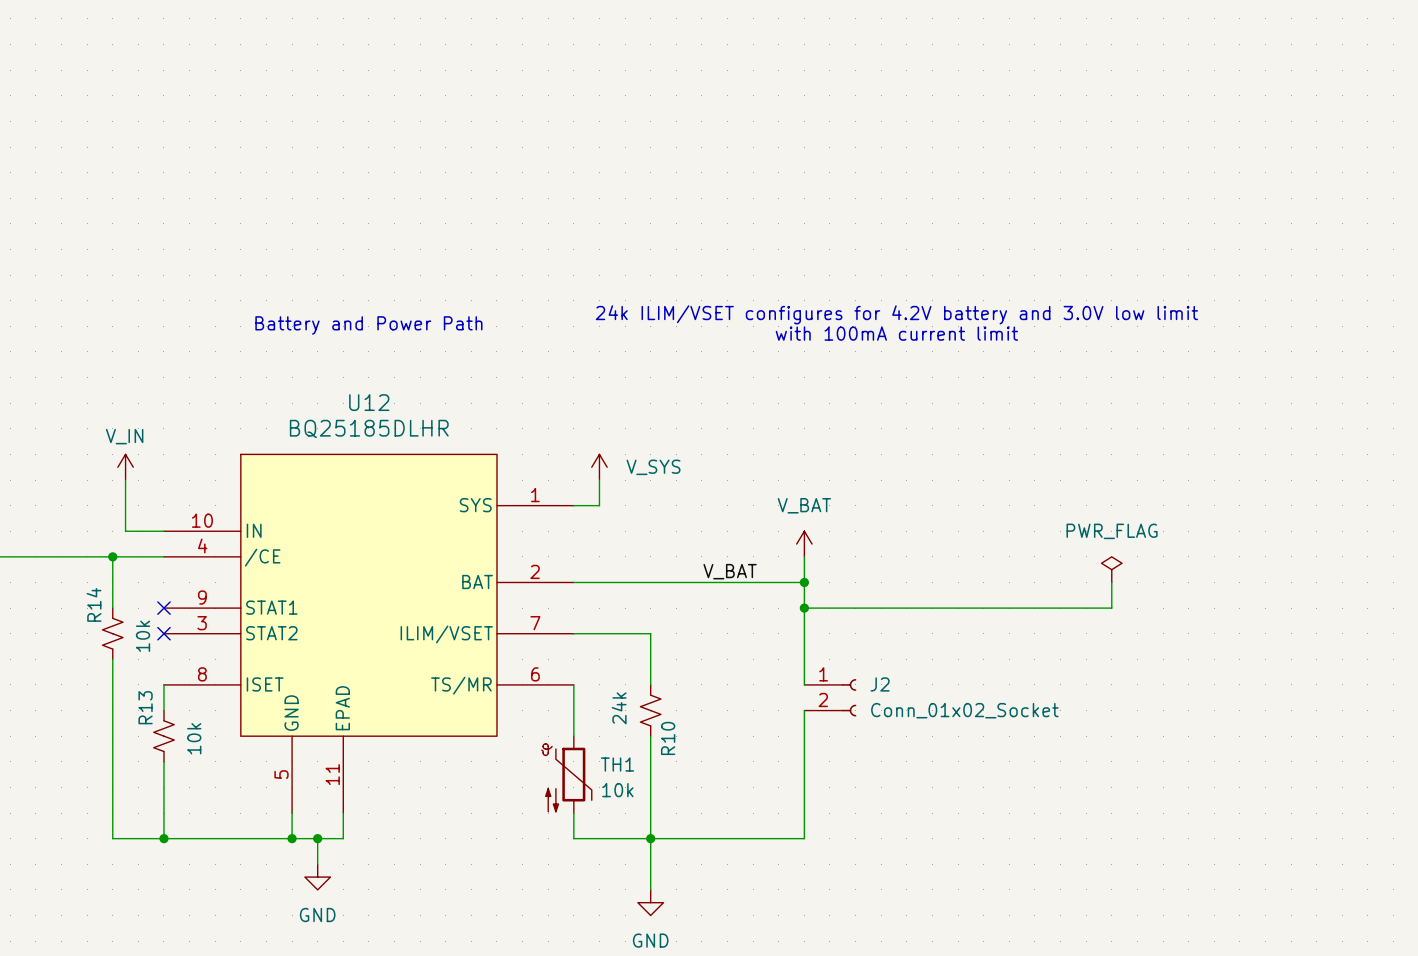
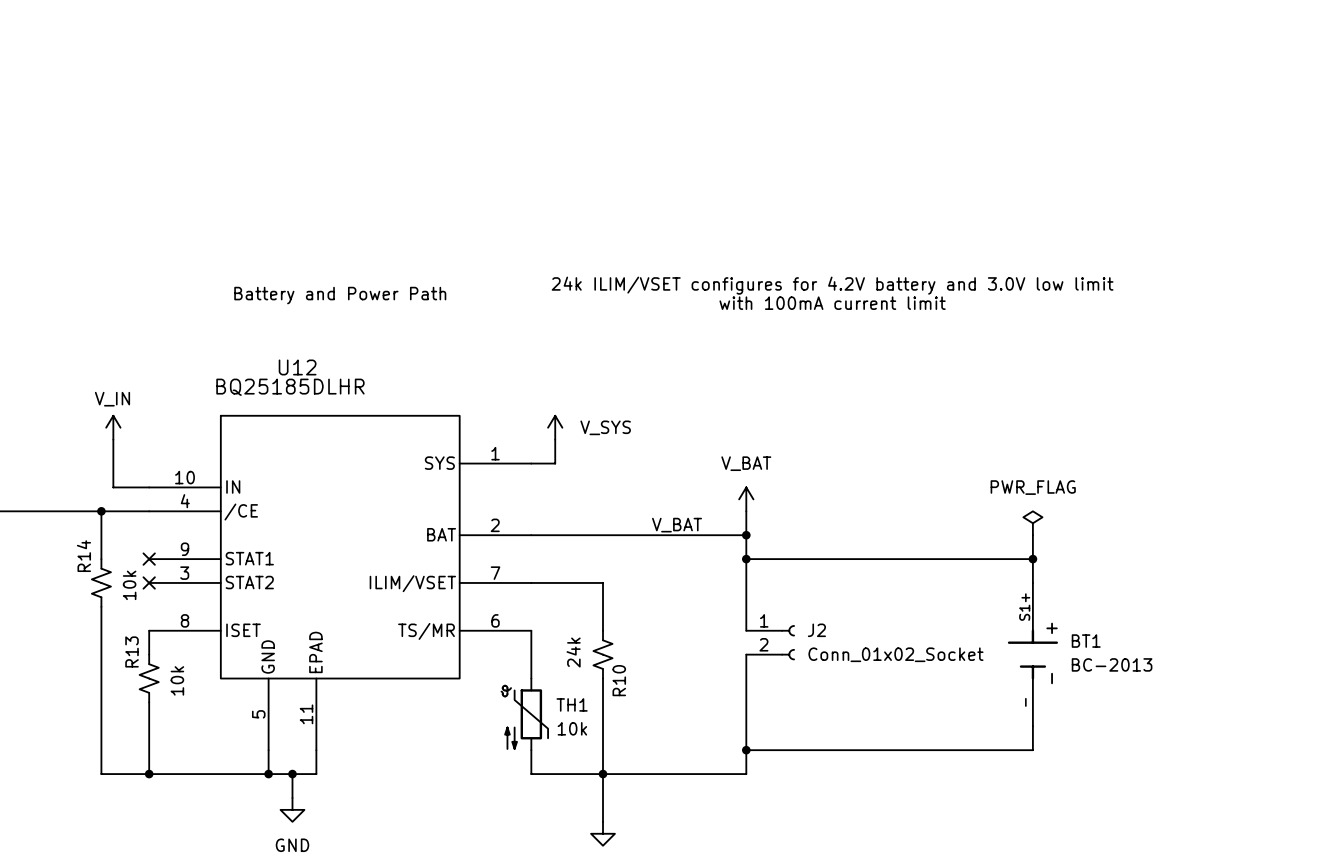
U12 name position: U12 (369, 402) -> U12 (297, 367)
U12 value position: BQ25185DLHR (369, 428) -> BQ25185DLHR (290, 387)
wire: none -> (1032, 559) (1032, 582)
junction: none -> (1032, 559)
BT1: none -> BC-2013 (1032, 654)
wire: none -> (1032, 726) (1032, 750) (746, 750)
junction: none -> (746, 750)

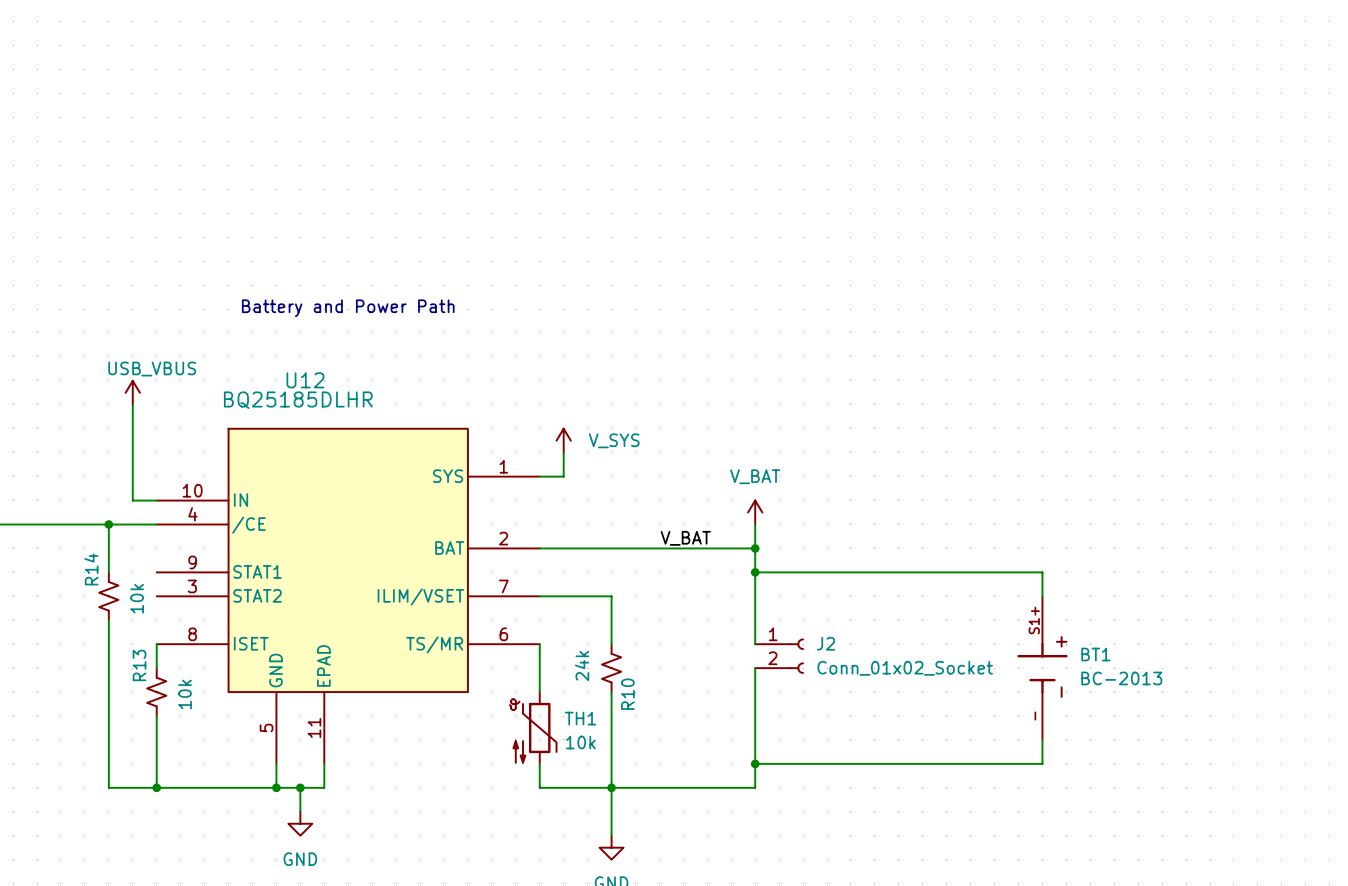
text: 24k ILIM/VSET configures for 4.2V battery and 3.0V low limit (832, 285) -> none
text: with 100mA current limit (832, 303) -> none
power symbol: none -> USB_VBUS (132, 392)
power symbol: V_IN (113, 427) -> none
wire: (113, 439) (113, 487) (125, 487) -> (132, 404) (132, 500)
power symbol: PWR_FLAG (1032, 523) -> none
wire: (1032, 535) (1032, 559) -> none
no-connect mark: (149, 559) -> none
junction: (1032, 559) -> none
no-connect mark: (149, 582) -> none

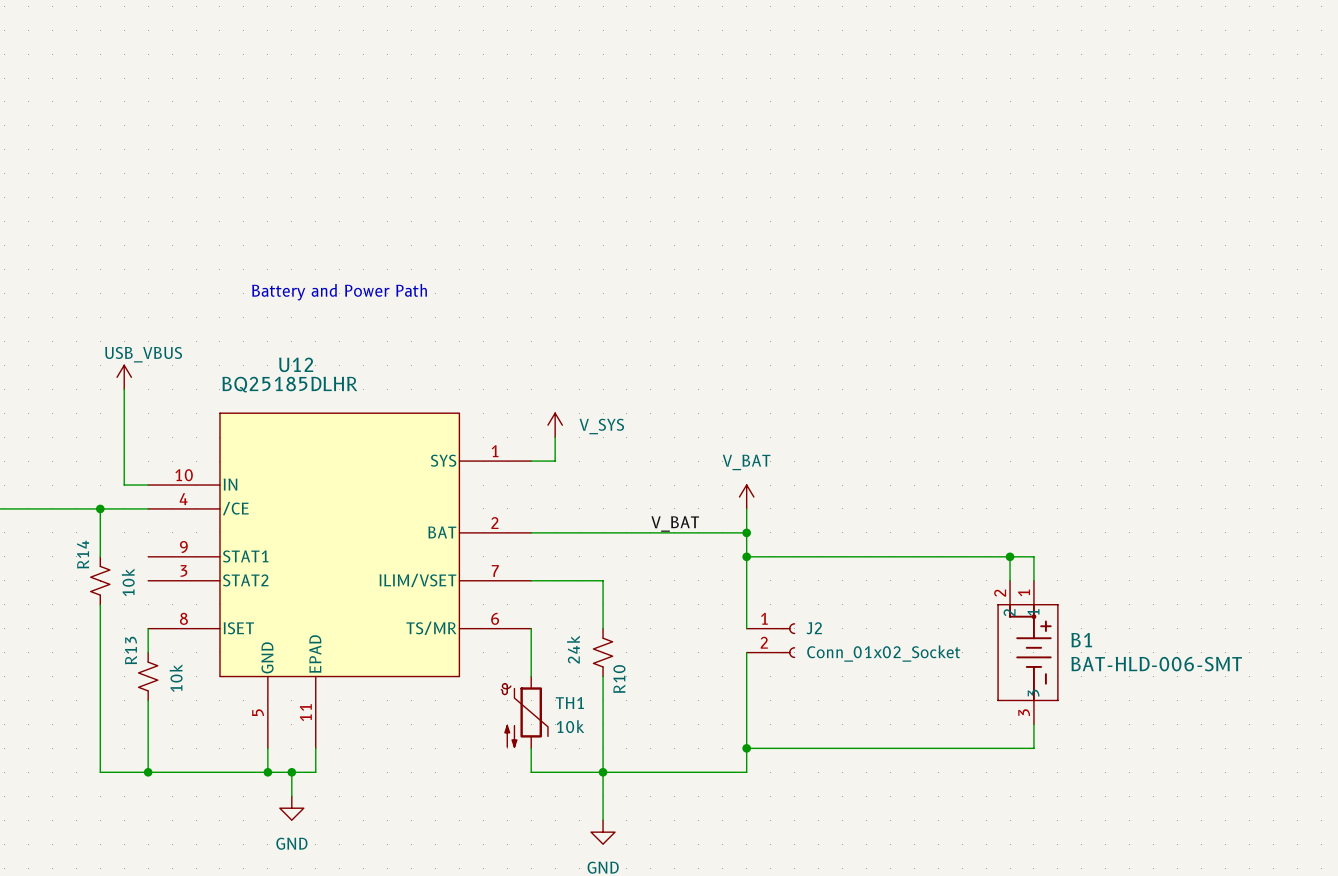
wire: none -> (1010, 556) (1010, 580)
junction: none -> (1010, 556)
B1: none -> BAT-HLD-006-SMT (1027, 652)
BT1: BC-2013 (1042, 668) -> none

